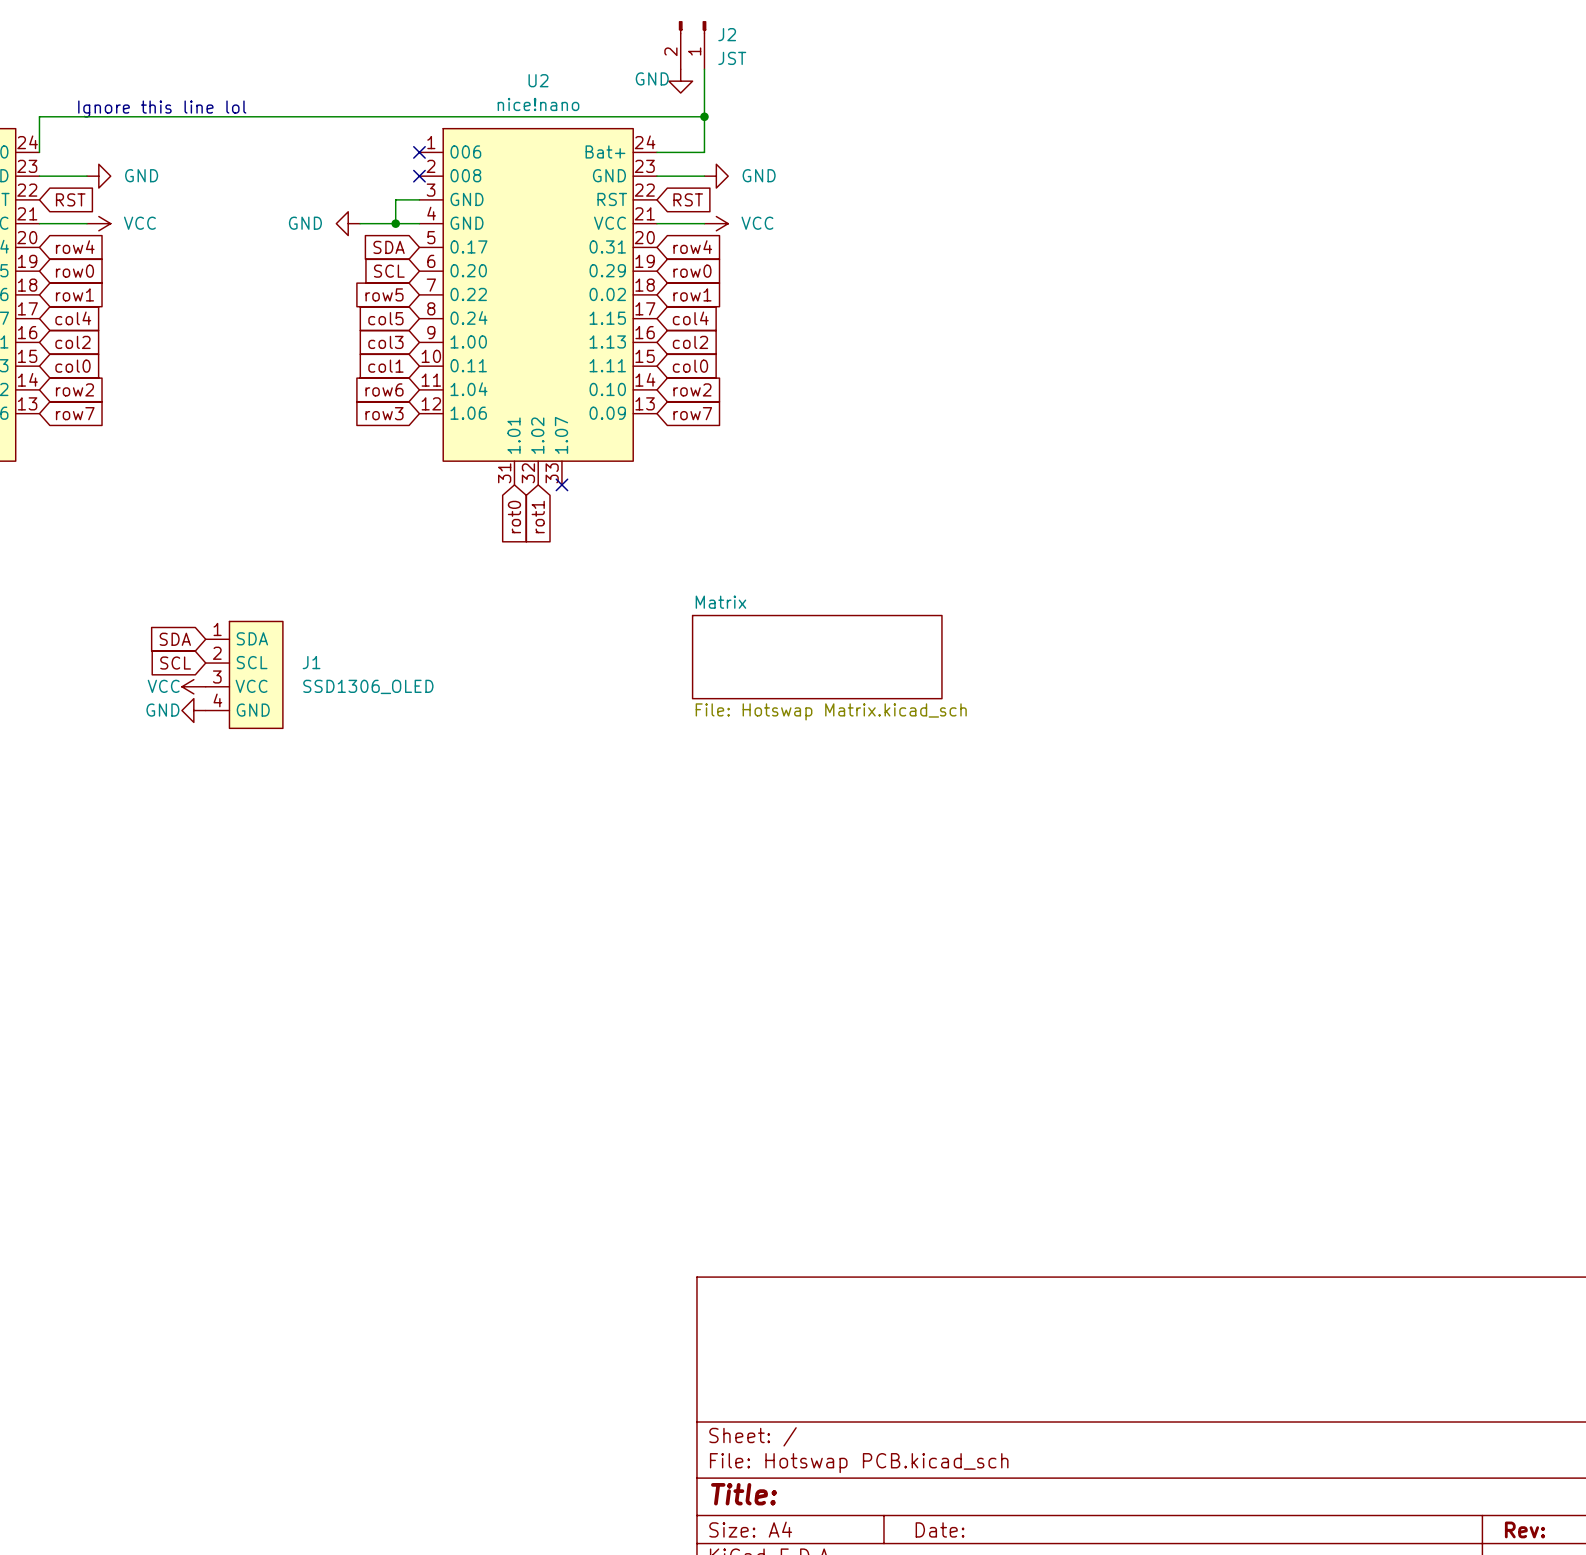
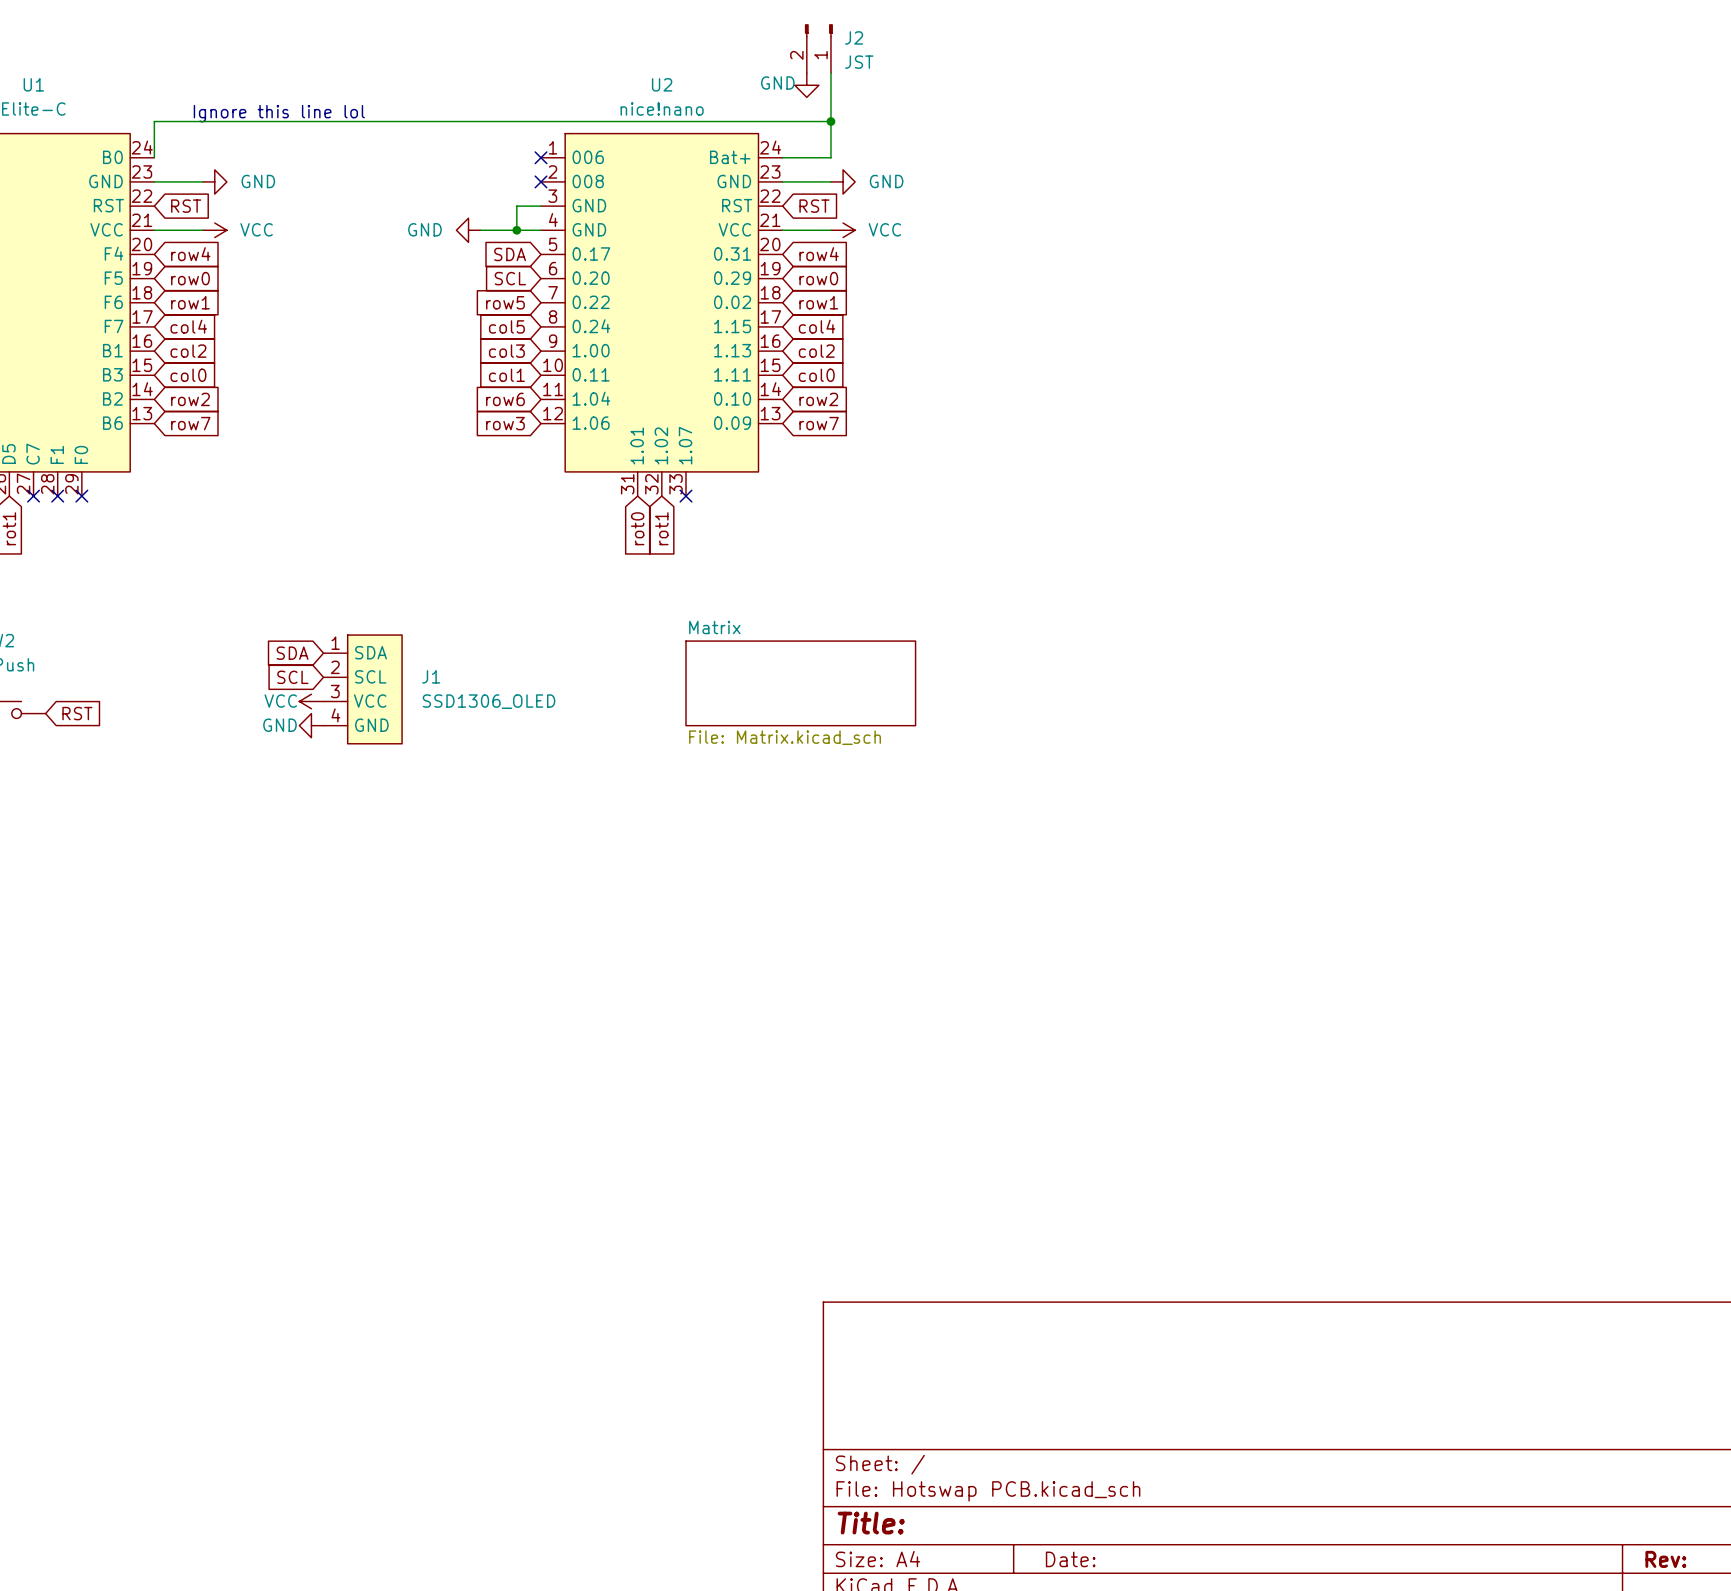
sheet Matrix: File: Hotswap Matrix.kicad_sch (817, 657) -> none
sheet Matrix: none -> File: Matrix.kicad_sch (800, 683)

